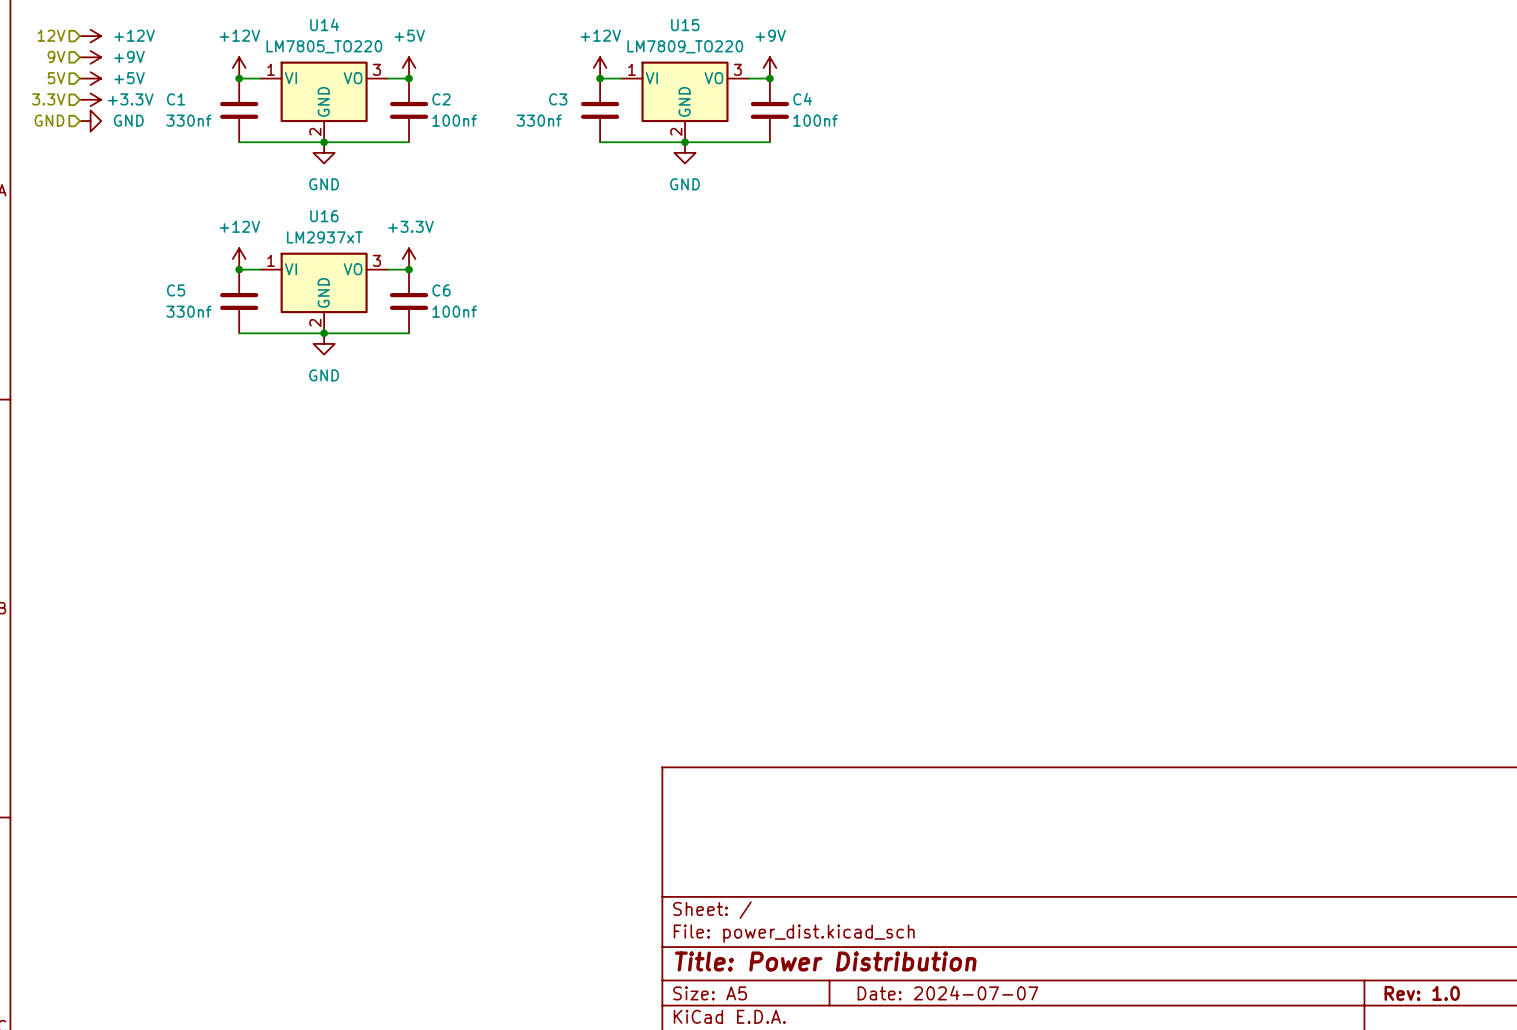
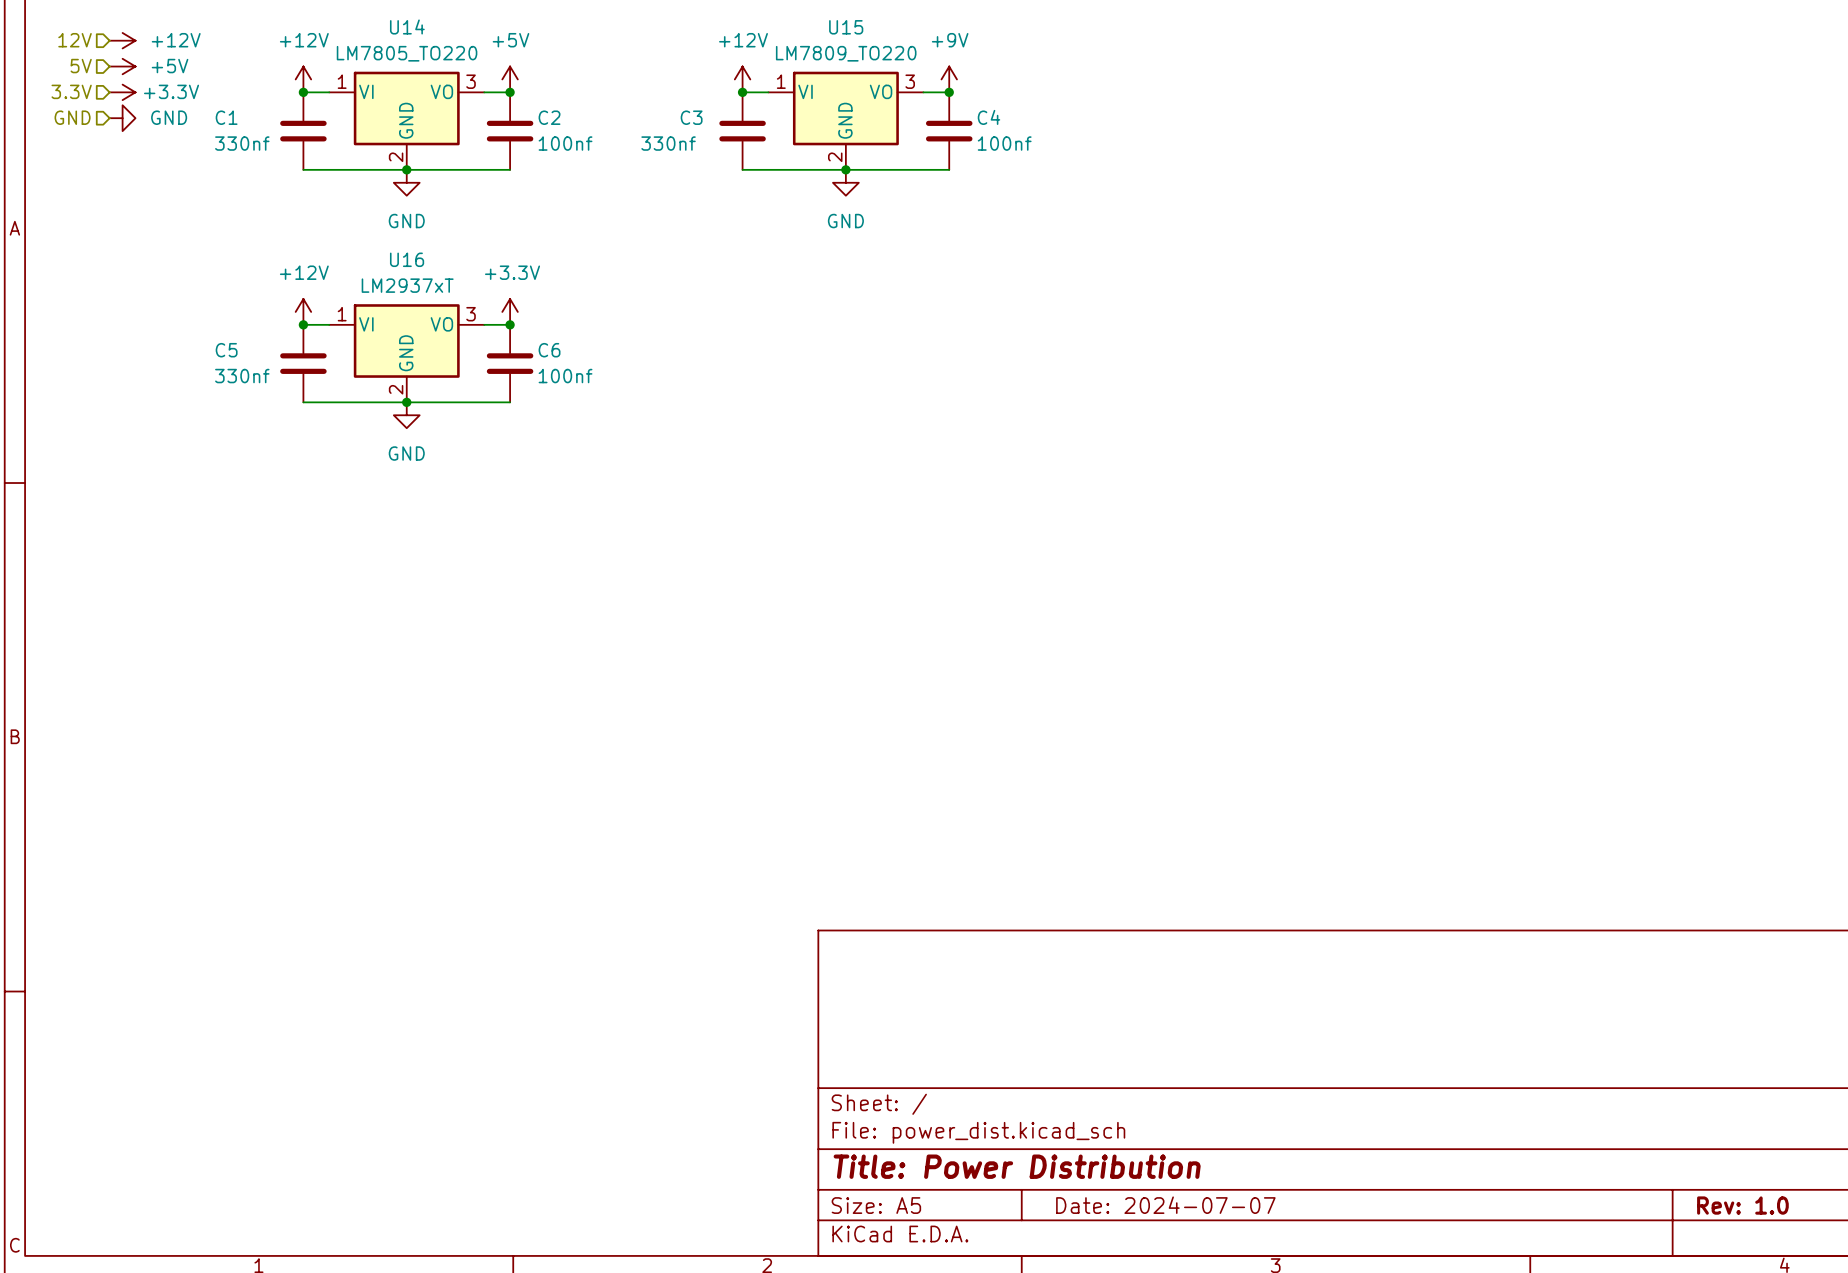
hierarchical label: 9V (56, 56) -> 5V (81, 66)
power symbol: +9V (90, 57) -> +5V (122, 66)
hierarchical label: 5V (56, 78) -> 3.3V (71, 91)
power symbol: +5V (90, 78) -> +3.3V (122, 92)
hierarchical label: 3.3V (48, 99) -> GND (72, 117)
power symbol: +3.3V (90, 99) -> GND (122, 118)
hierarchical label: GND (49, 120) -> none
power symbol: GND (90, 121) -> none

